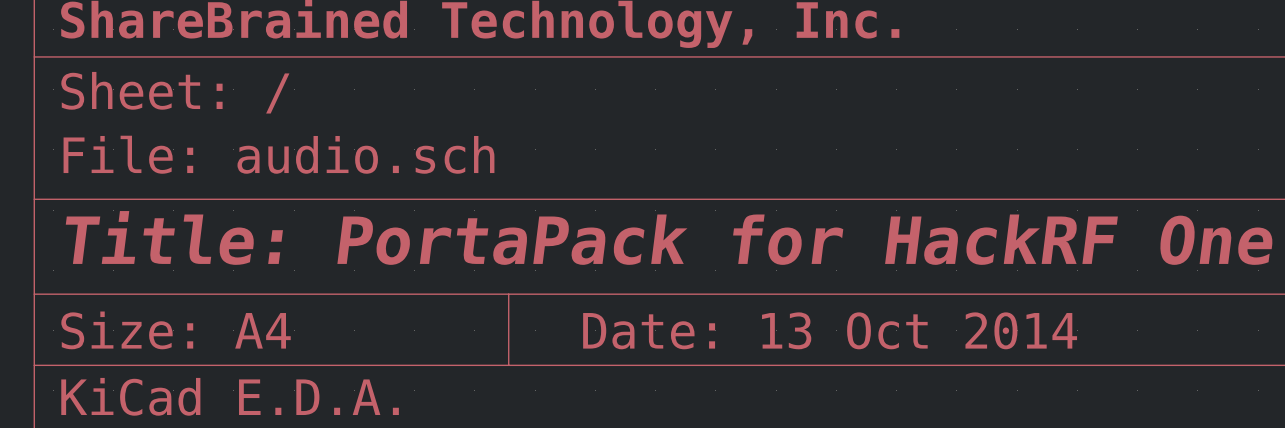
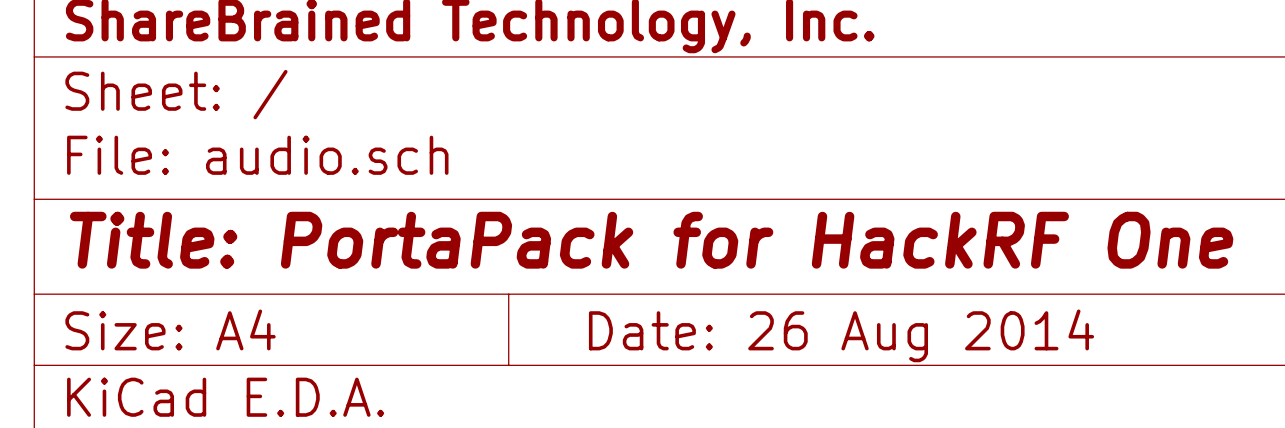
title block: Date: 13 Oct 2014 (830, 330) -> Date: 26 Aug 2014 (841, 335)

